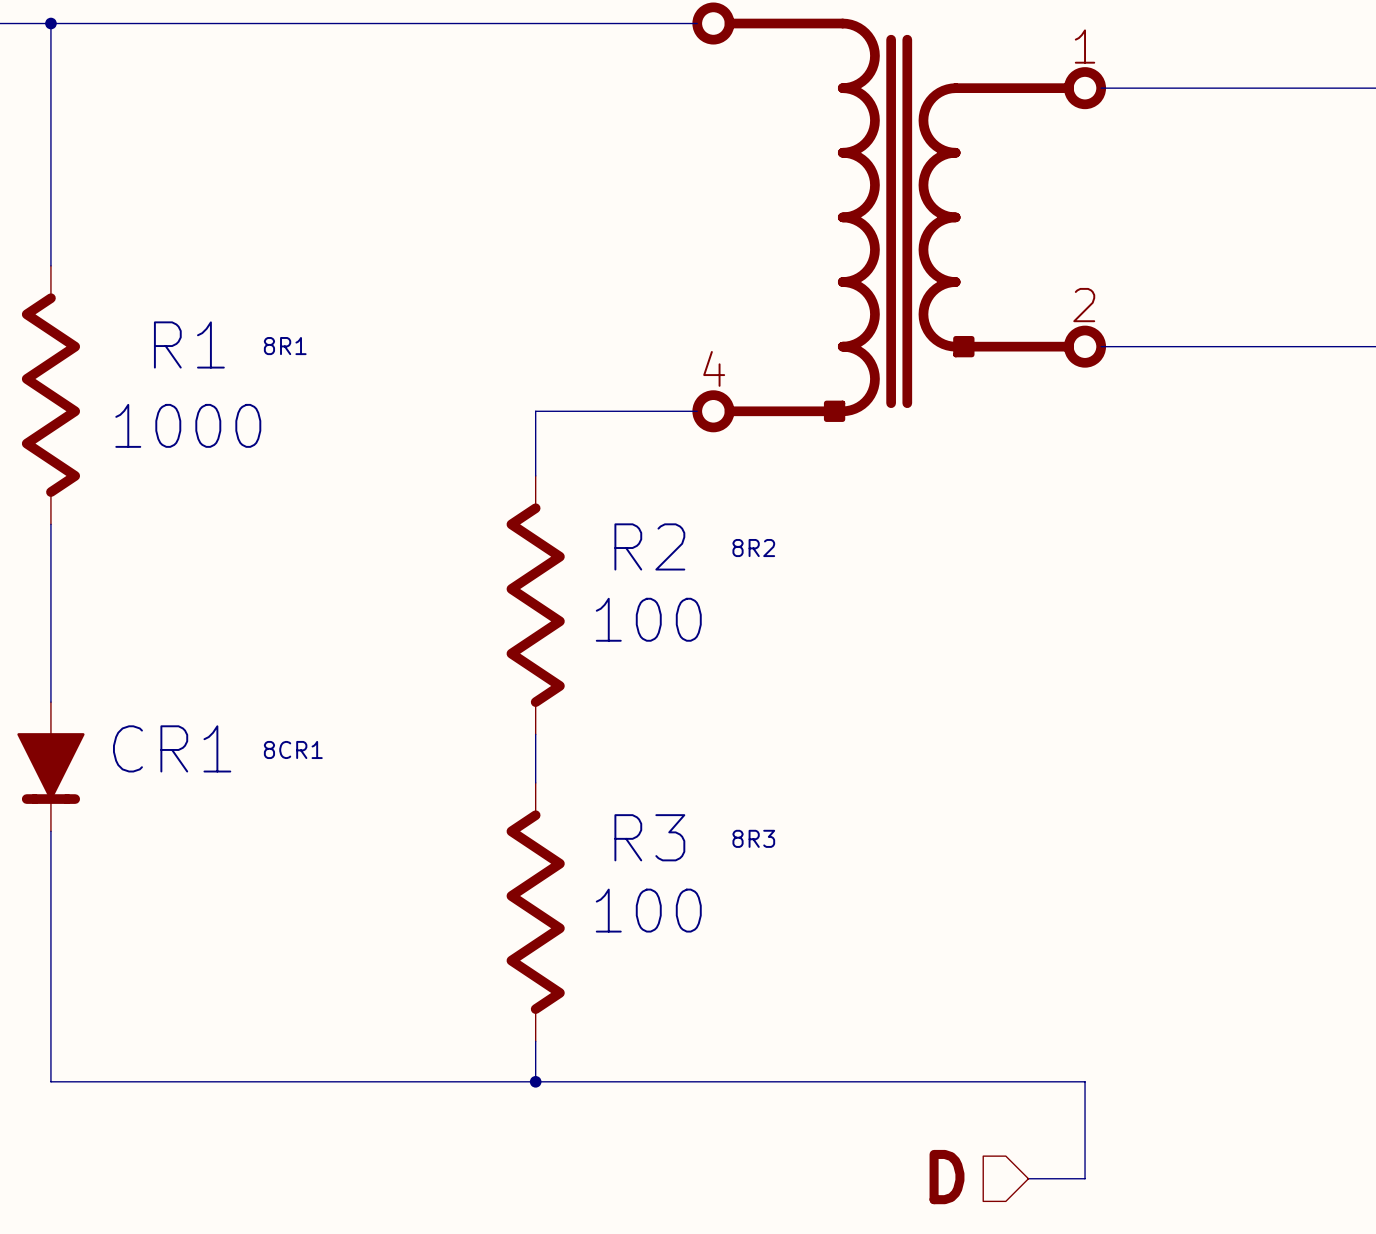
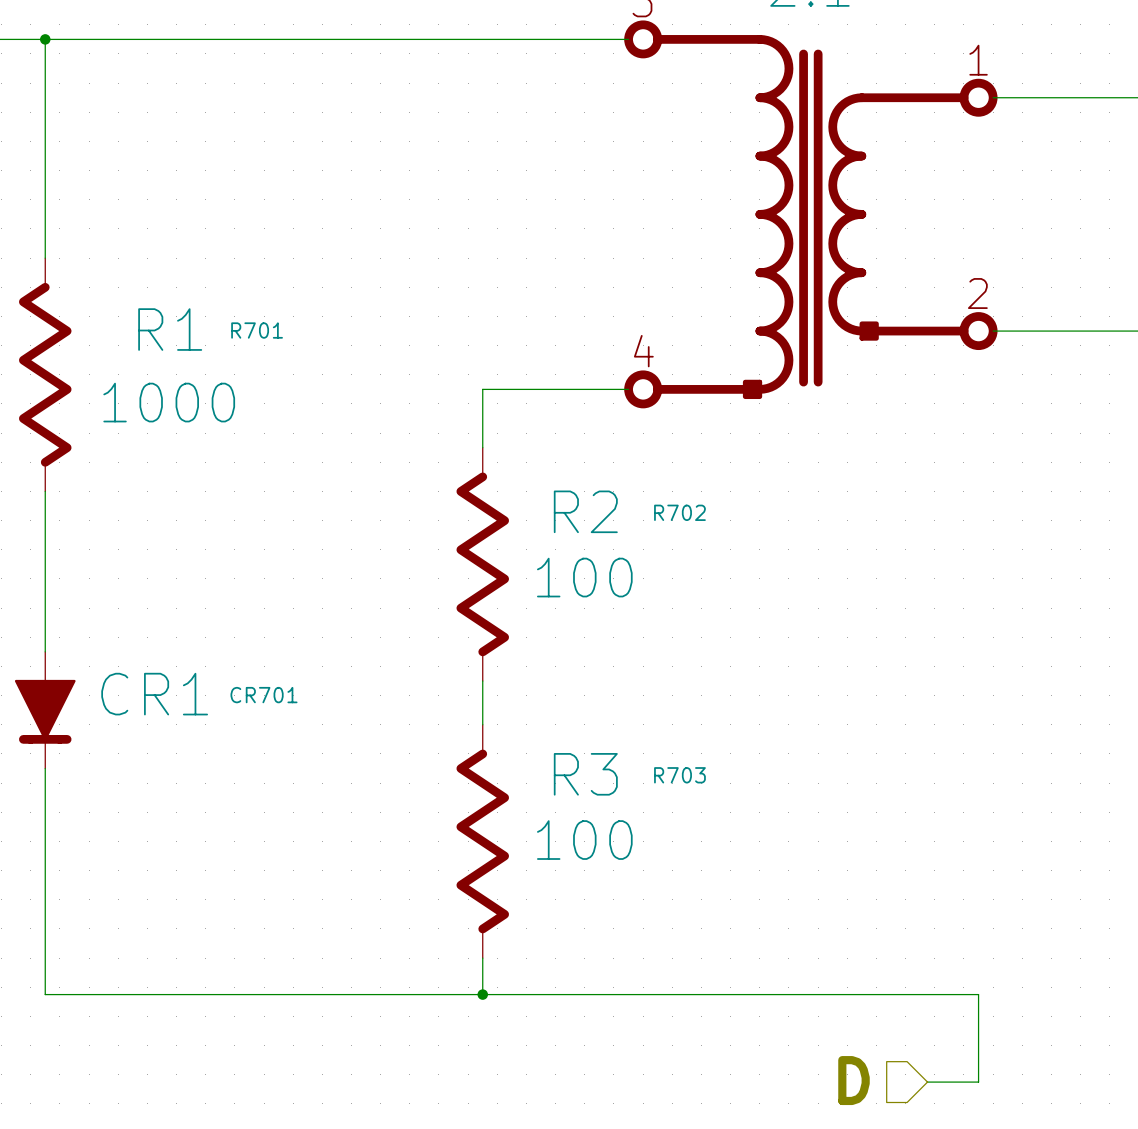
8R1 name: 8R1 (285, 346) -> R701 (257, 330)
8R2 name: 8R2 (753, 548) -> R702 (679, 512)
8CR1 name: 8CR1 (293, 749) -> CR701 (264, 695)
8R3 name: 8R3 (753, 838) -> R703 (679, 775)

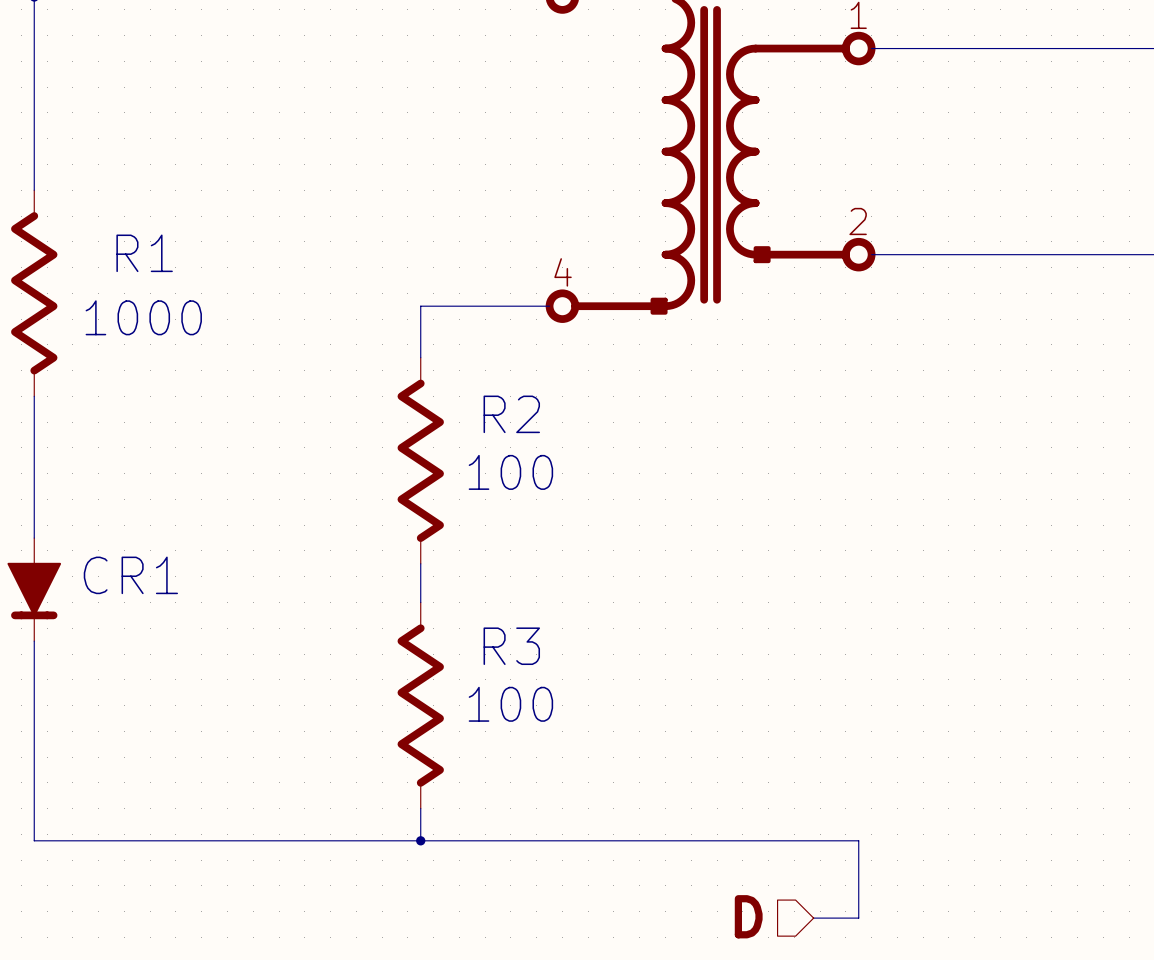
R701 name: R701 (257, 330) -> none
R702 name: R702 (679, 512) -> none
CR701 name: CR701 (264, 695) -> none
R703 name: R703 (679, 775) -> none

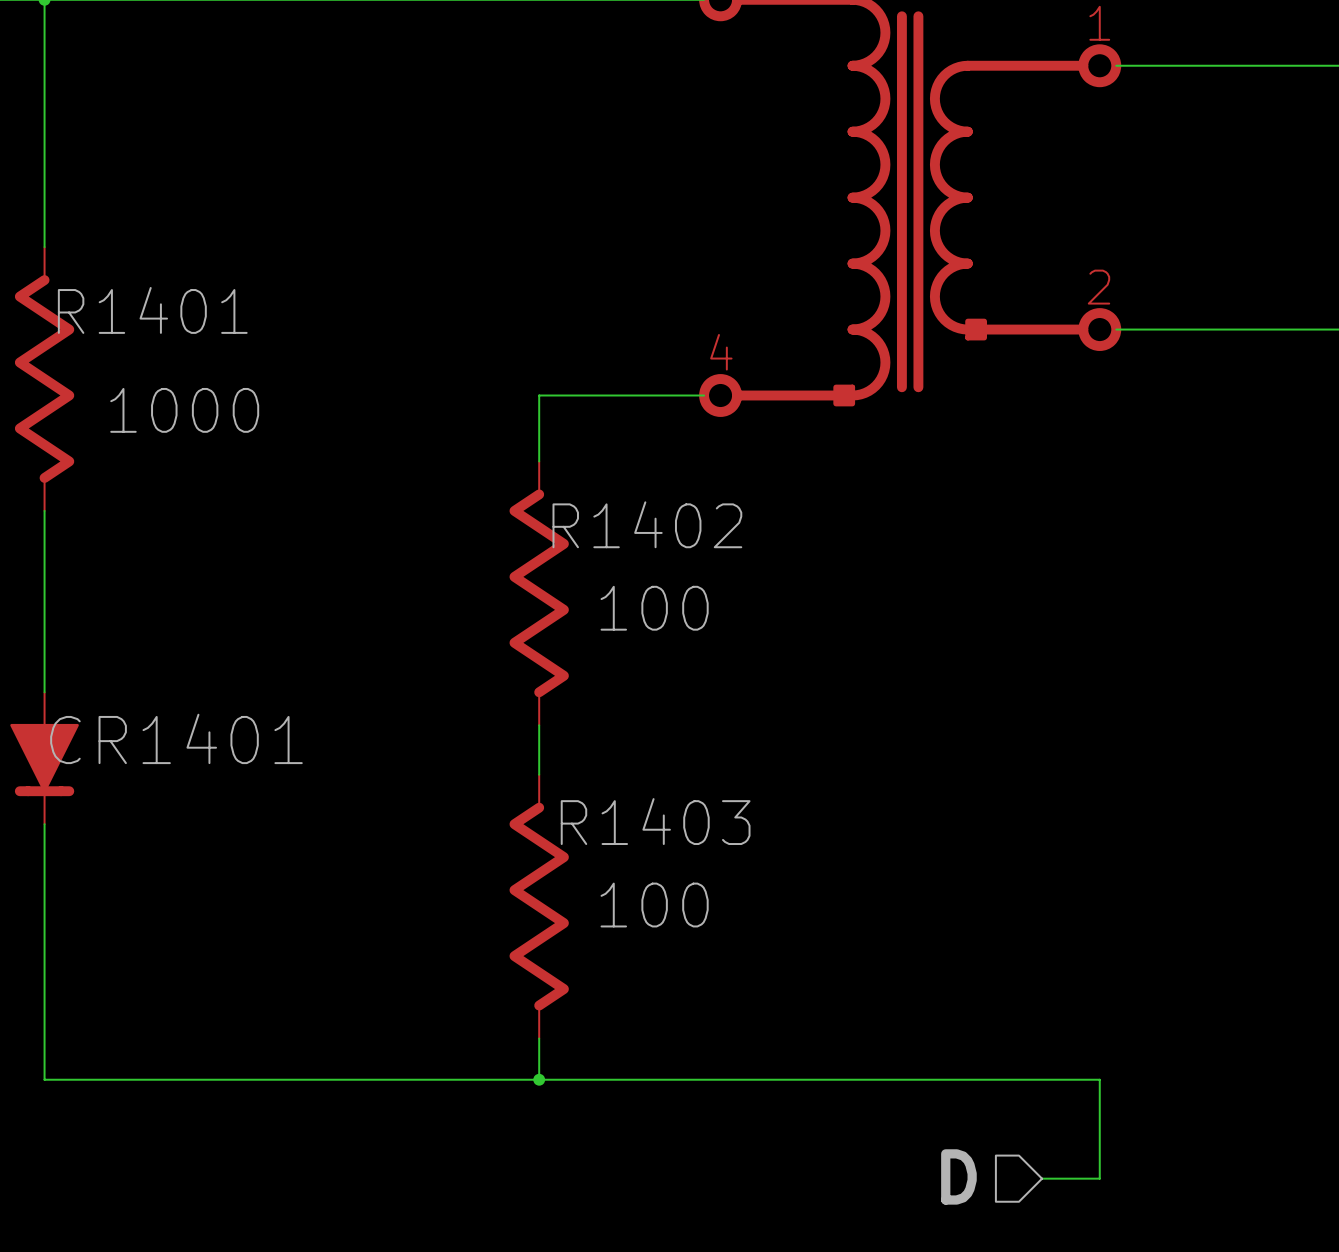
R1401 name: none -> R1401 (152, 310)
R1401 text: R1 (144, 253) -> none
R1402 name: none -> R1402 (647, 524)
R1402 text: R2 (511, 414) -> none
CR1401 name: none -> CR1401 (176, 738)
CR1401 text: CR1 (130, 575) -> none
R1403 name: none -> R1403 (655, 821)
R1403 text: R3 (511, 646) -> none

